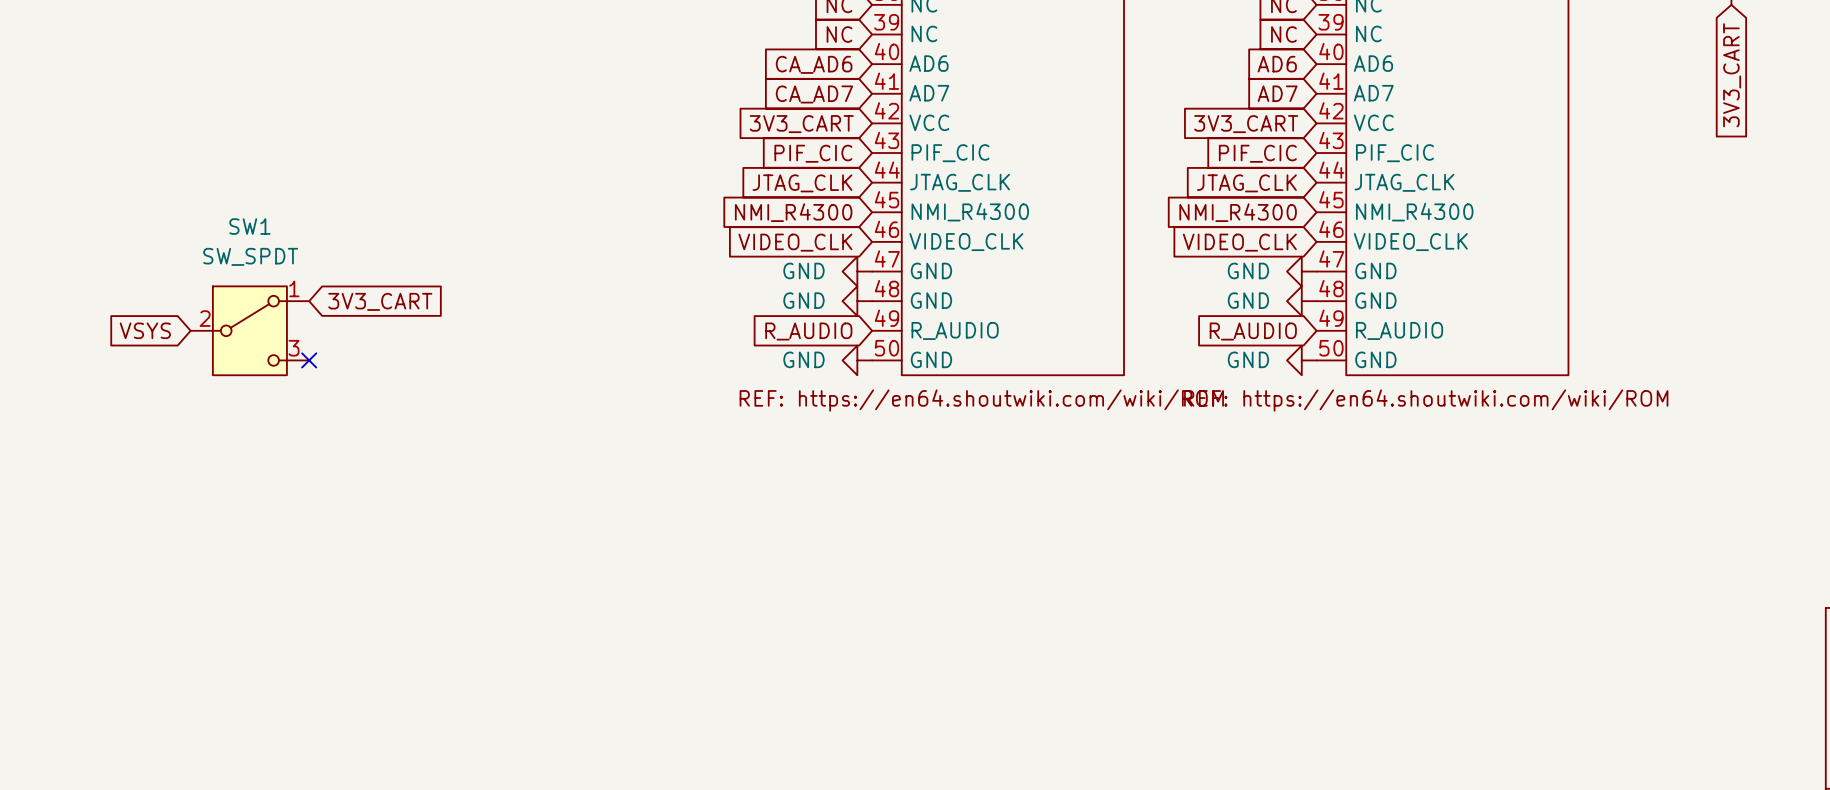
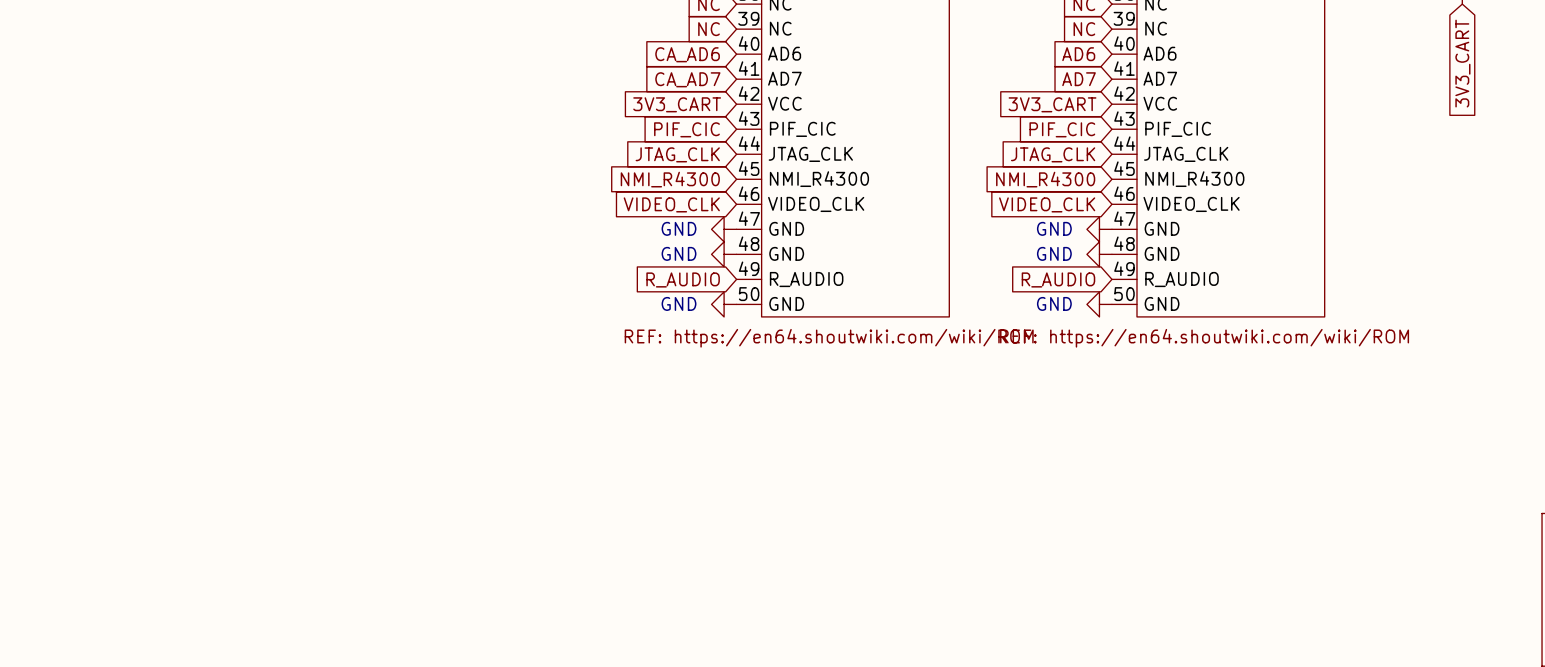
global label: 3V3_CART (380, 301) -> none
global label: VSYS (145, 330) -> none
SW1: SW_SPDT (249, 330) -> none
no-connect mark: (309, 360) -> none

